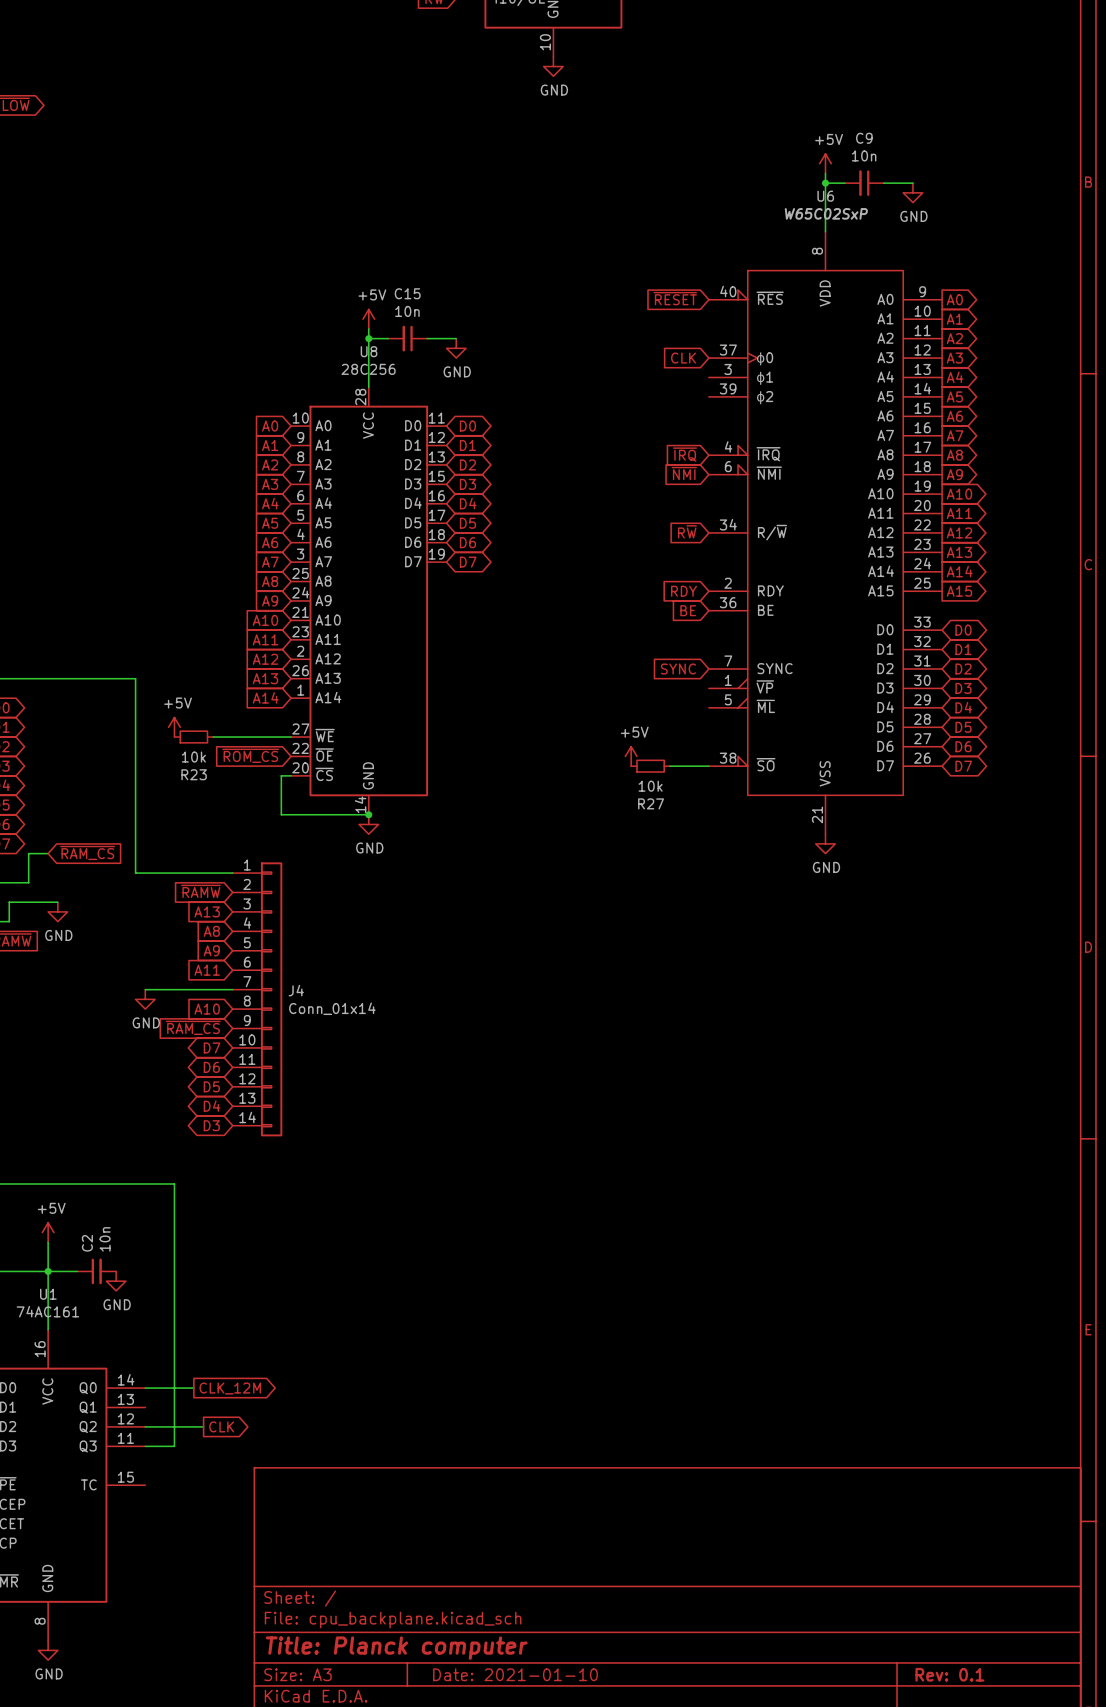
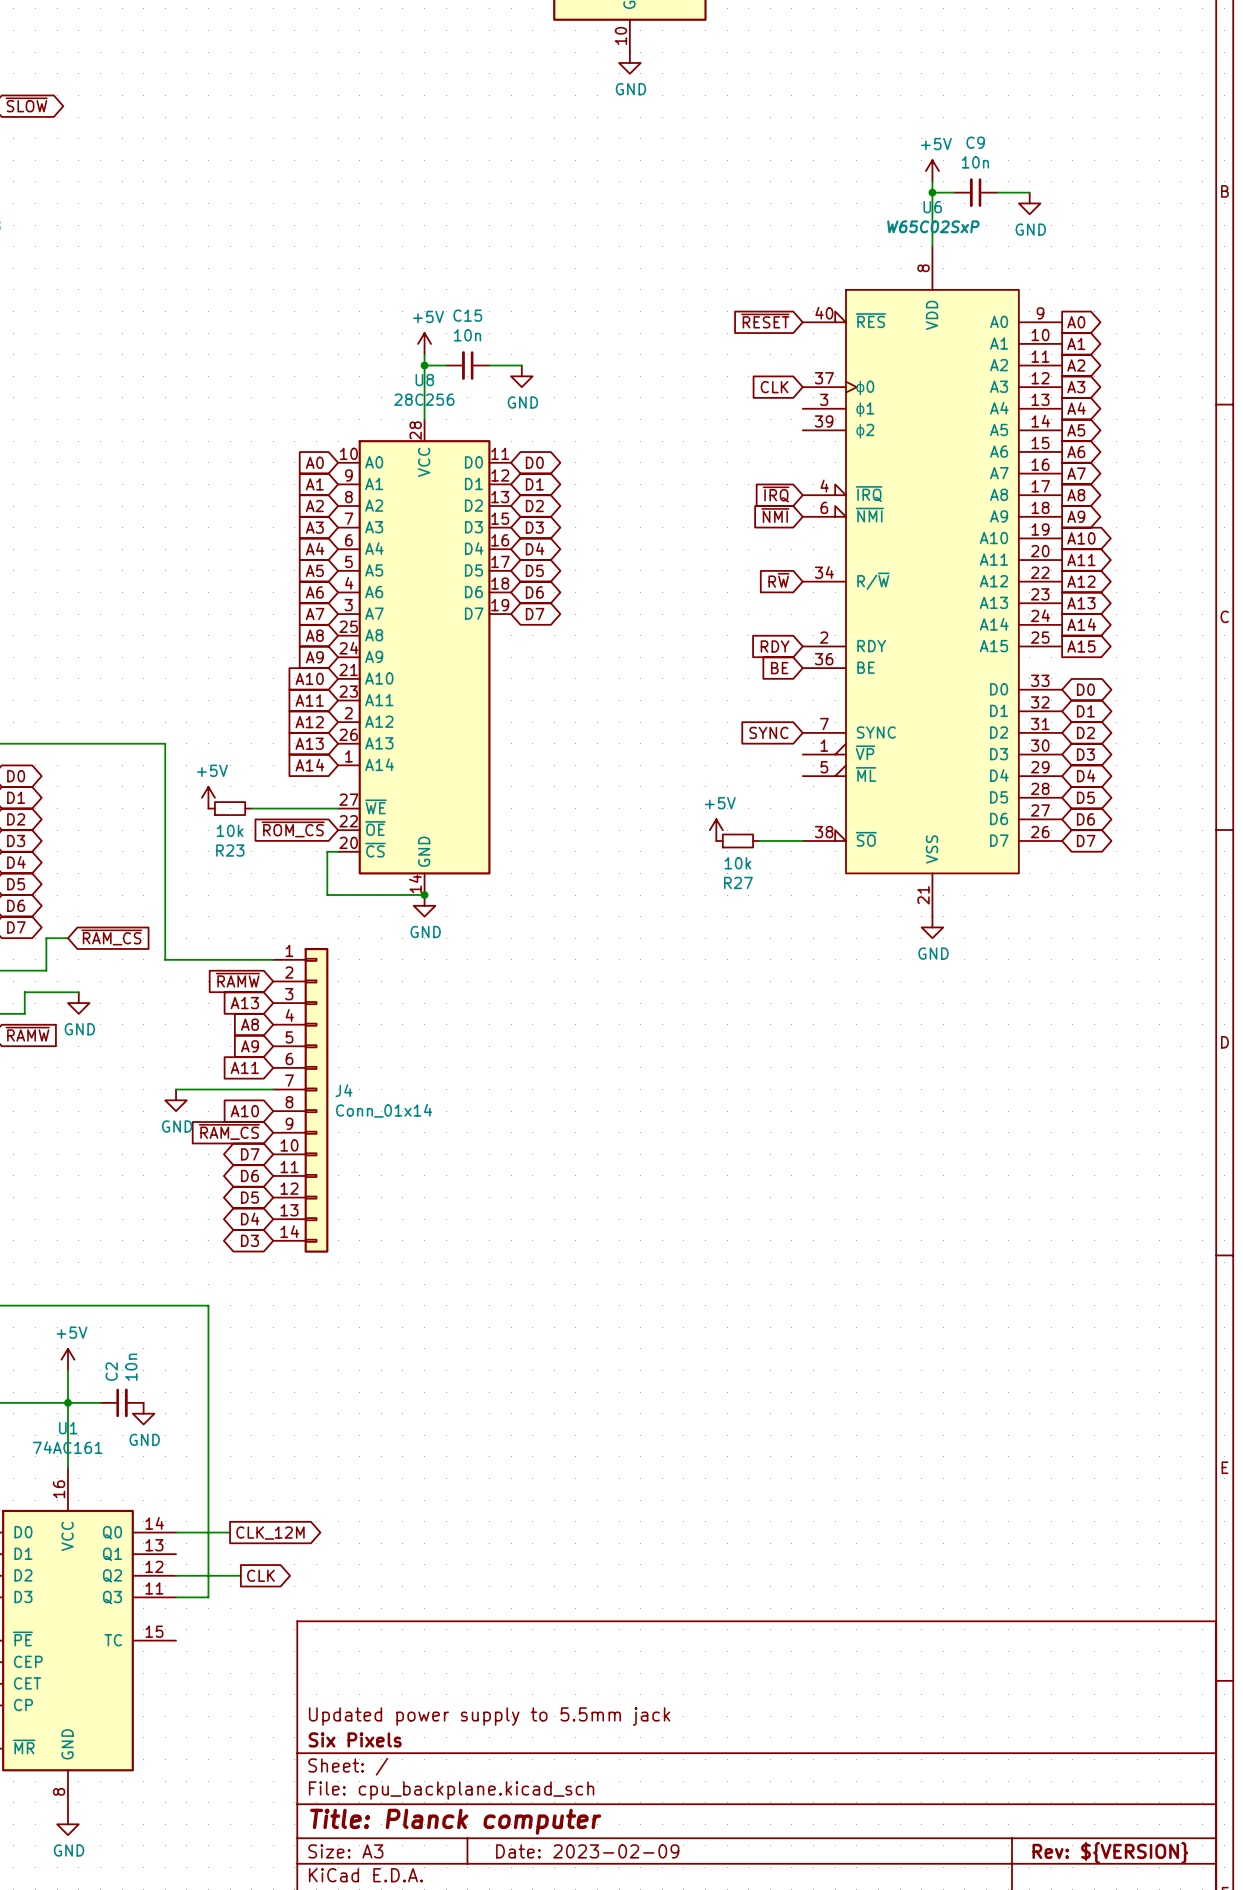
title block: none -> Updated power supply to 5.5mm jack (489, 1716)
title block: none -> Six Pixels (355, 1739)
title block: Date: 2021-01-10 (515, 1674) -> Date: 2023-02-09 (587, 1851)
title block: Rev: 0.1 (949, 1674) -> Rev: ${VERSION} (1110, 1852)

